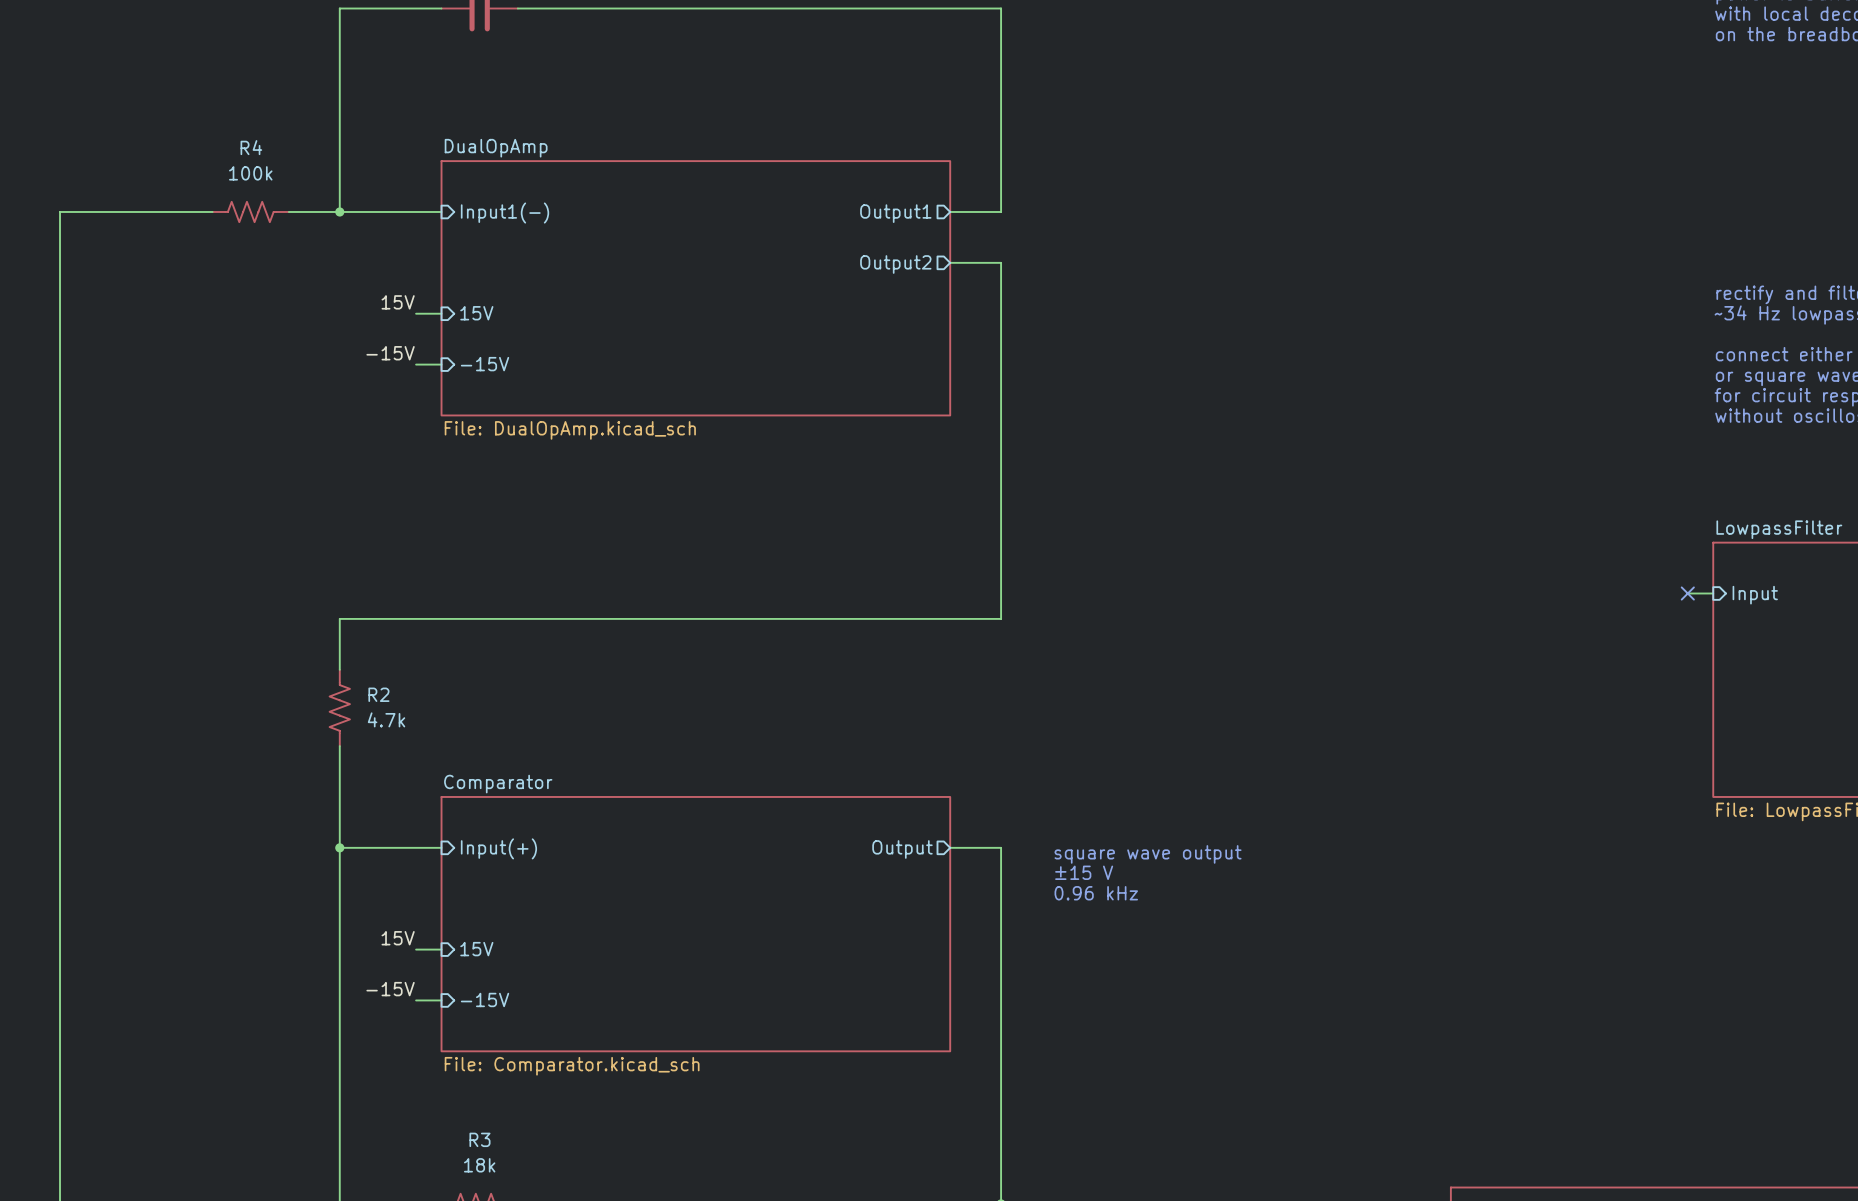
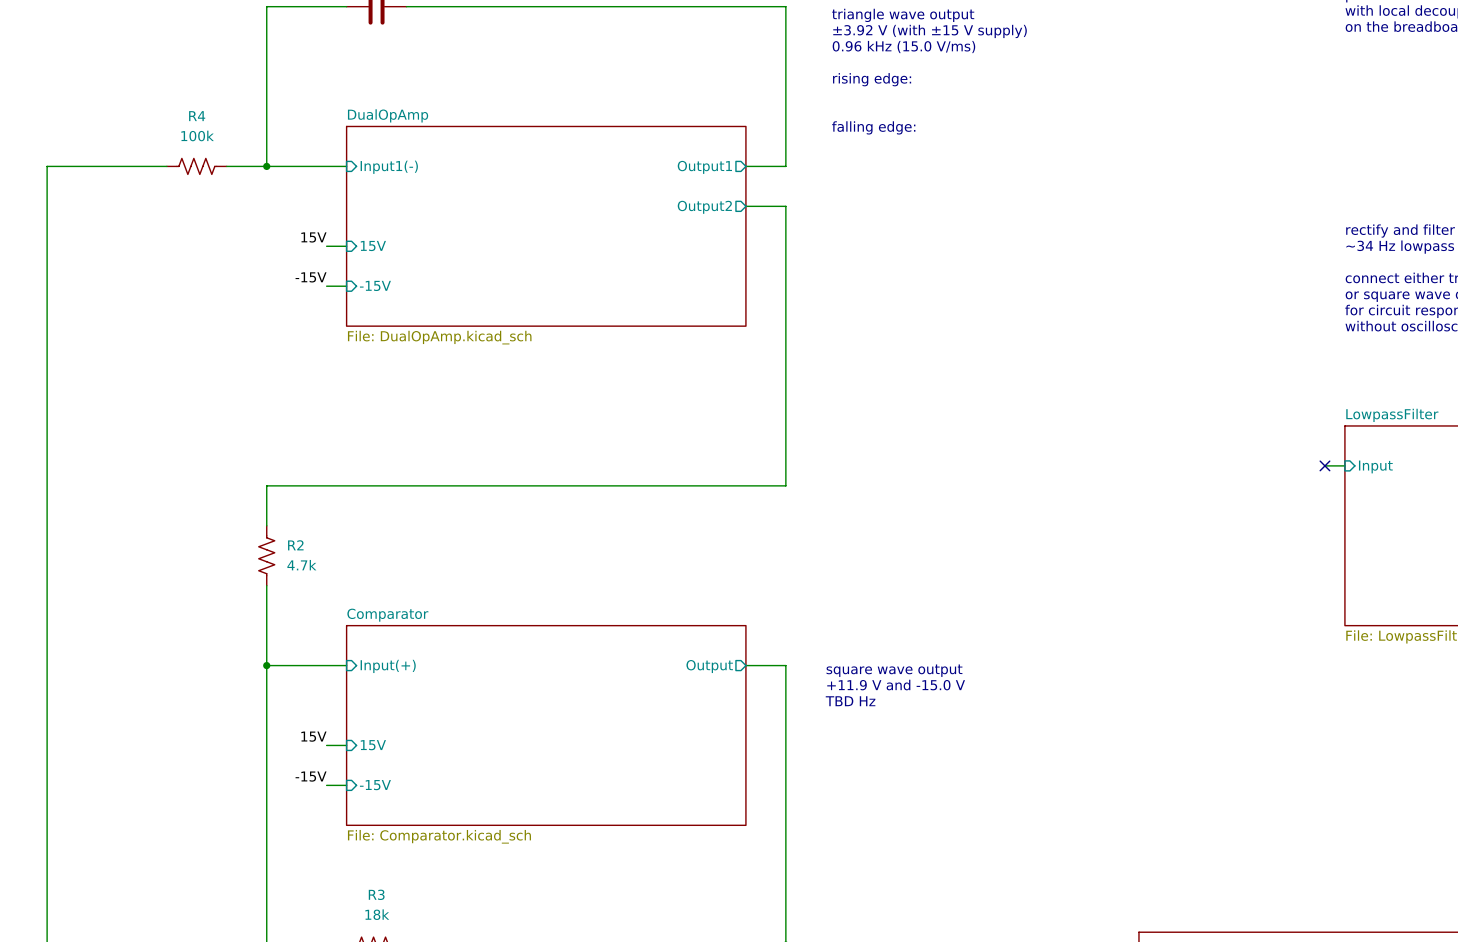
text: none -> triangle wave output (903, 15)
text: none -> ±3.92 V (with ±15 V supply) (930, 31)
text: none -> 0.96 kHz (15.0 V/ms) (903, 47)
text: none -> rising edge: (872, 79)
text: none -> falling edge: (873, 127)
text: ±15 V (1084, 872) -> +11.9 V and -15.0 V (896, 685)
text: 0.96 kHz (1096, 893) -> TBD Hz (850, 701)

